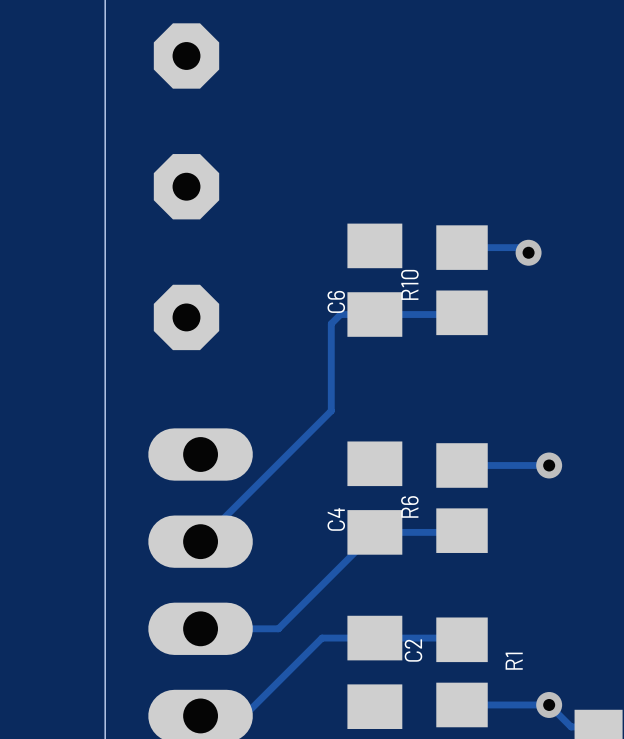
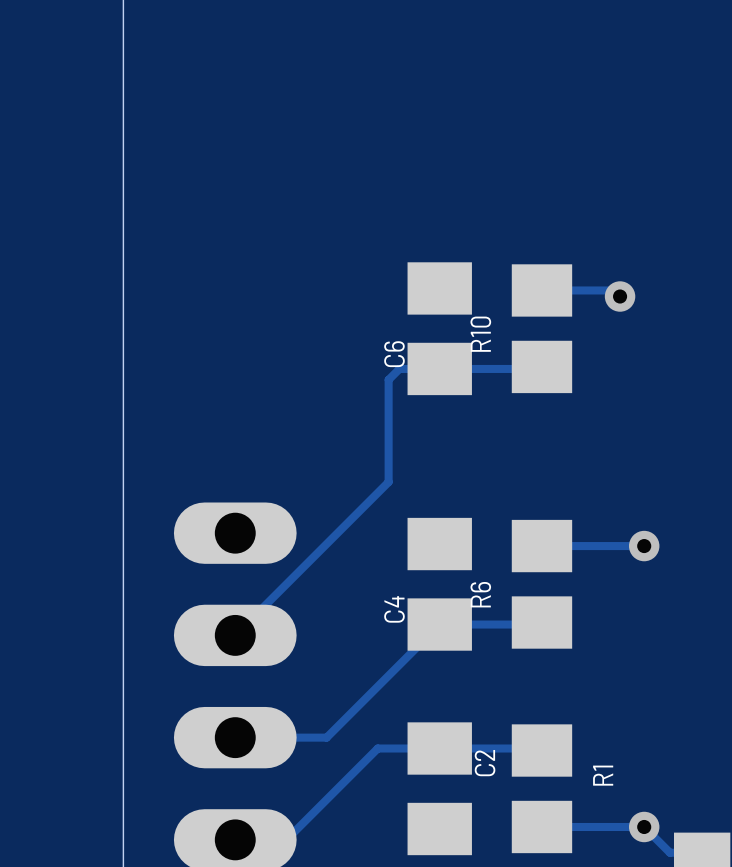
part: (186, 186) -> none

